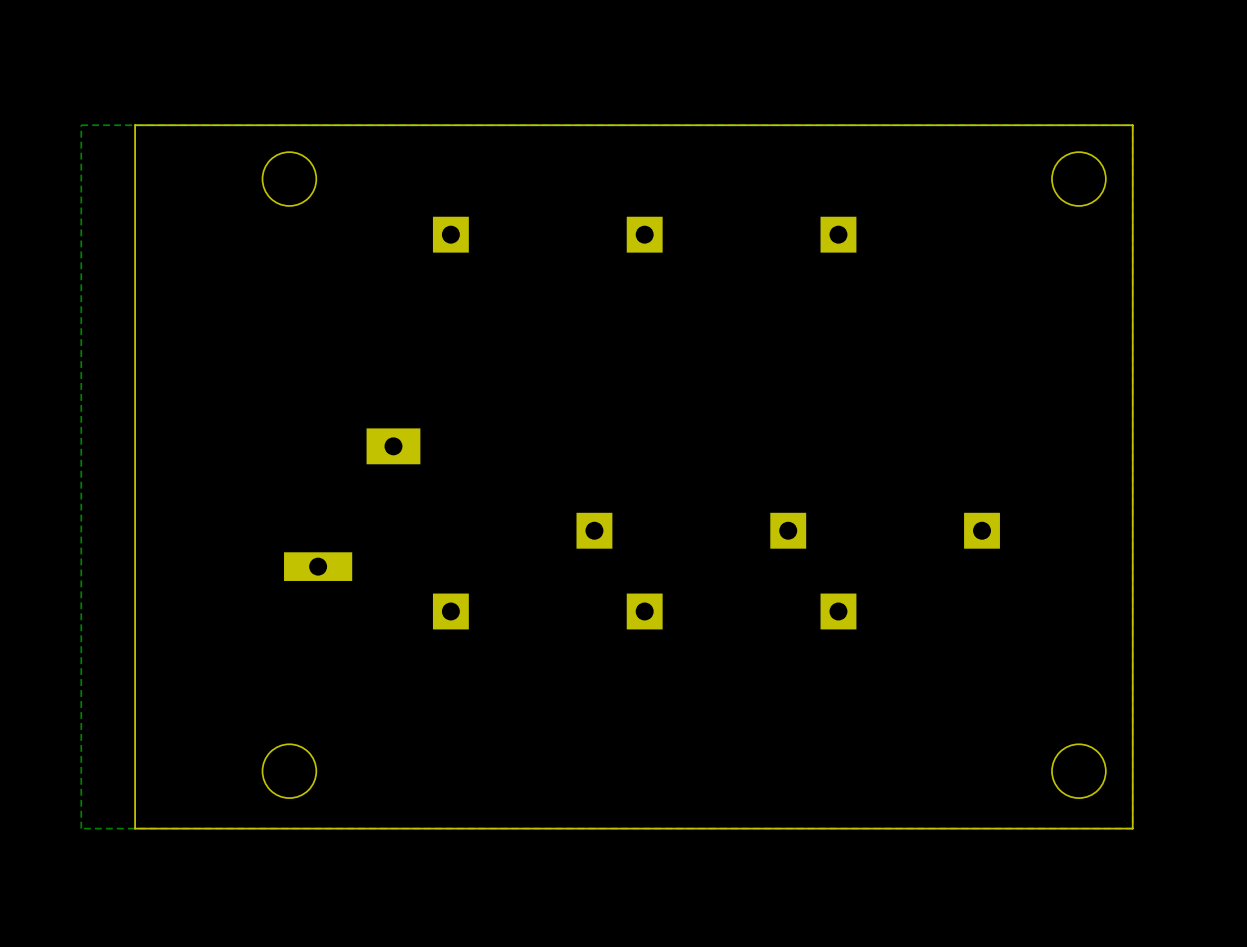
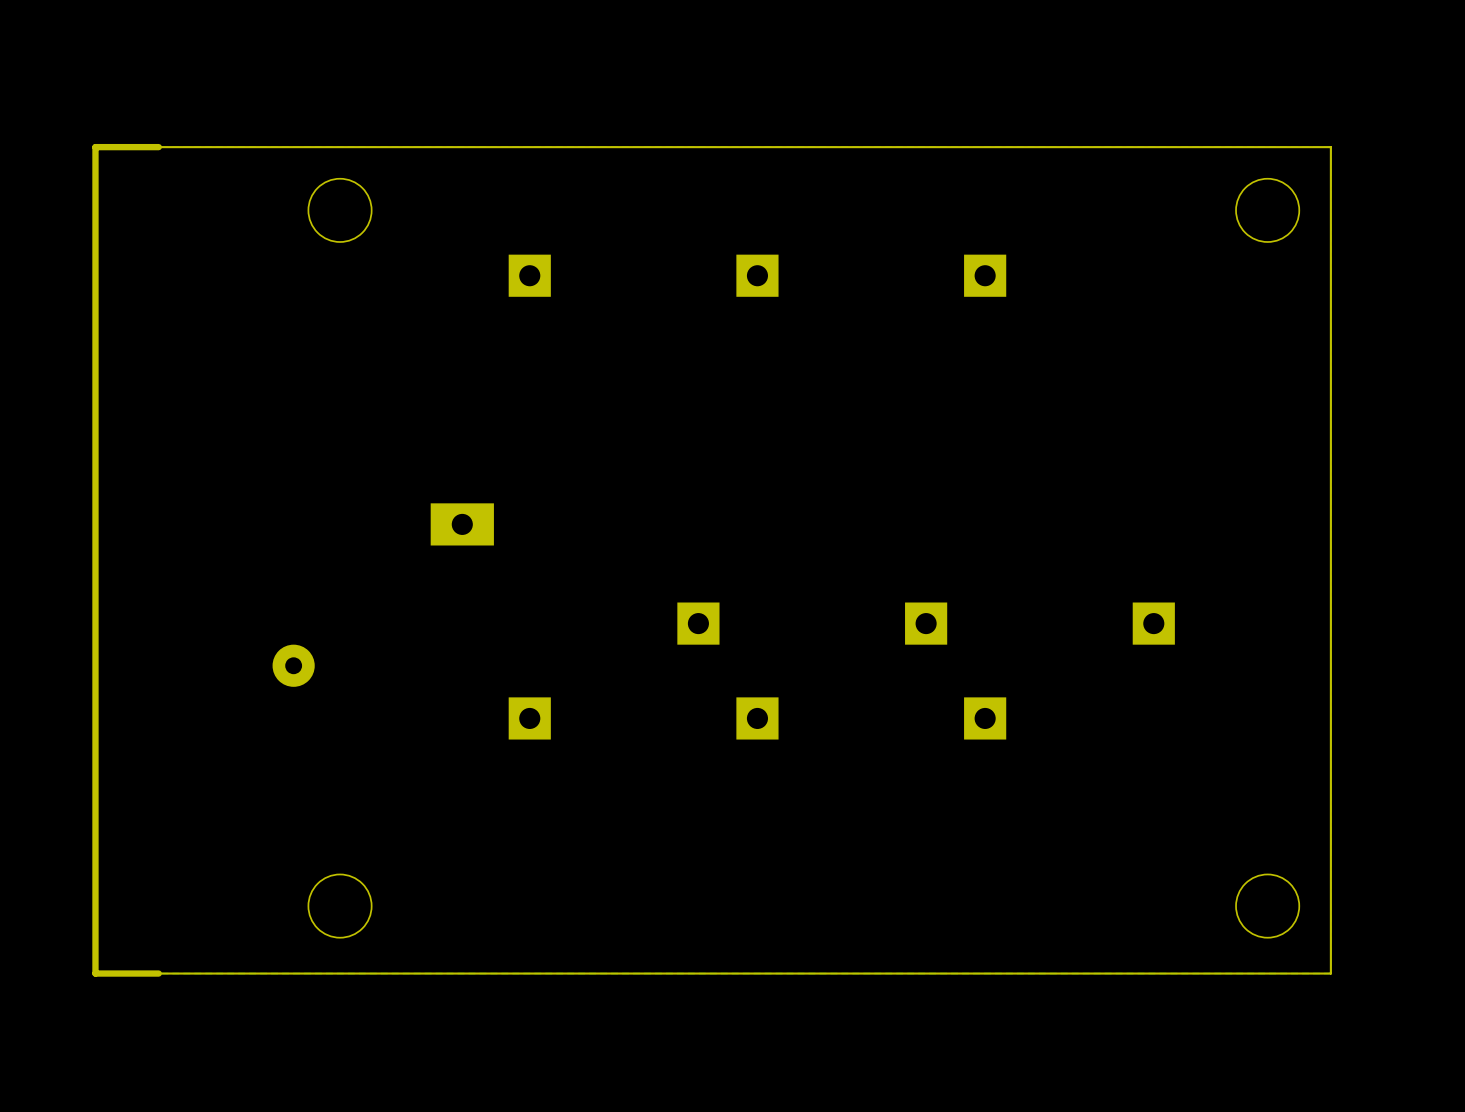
board edge: (135, 125) (135, 828) -> (158, 147) (95, 147) (95, 973) (158, 973)
part: none -> (293, 665)
part: (318, 566) -> none

